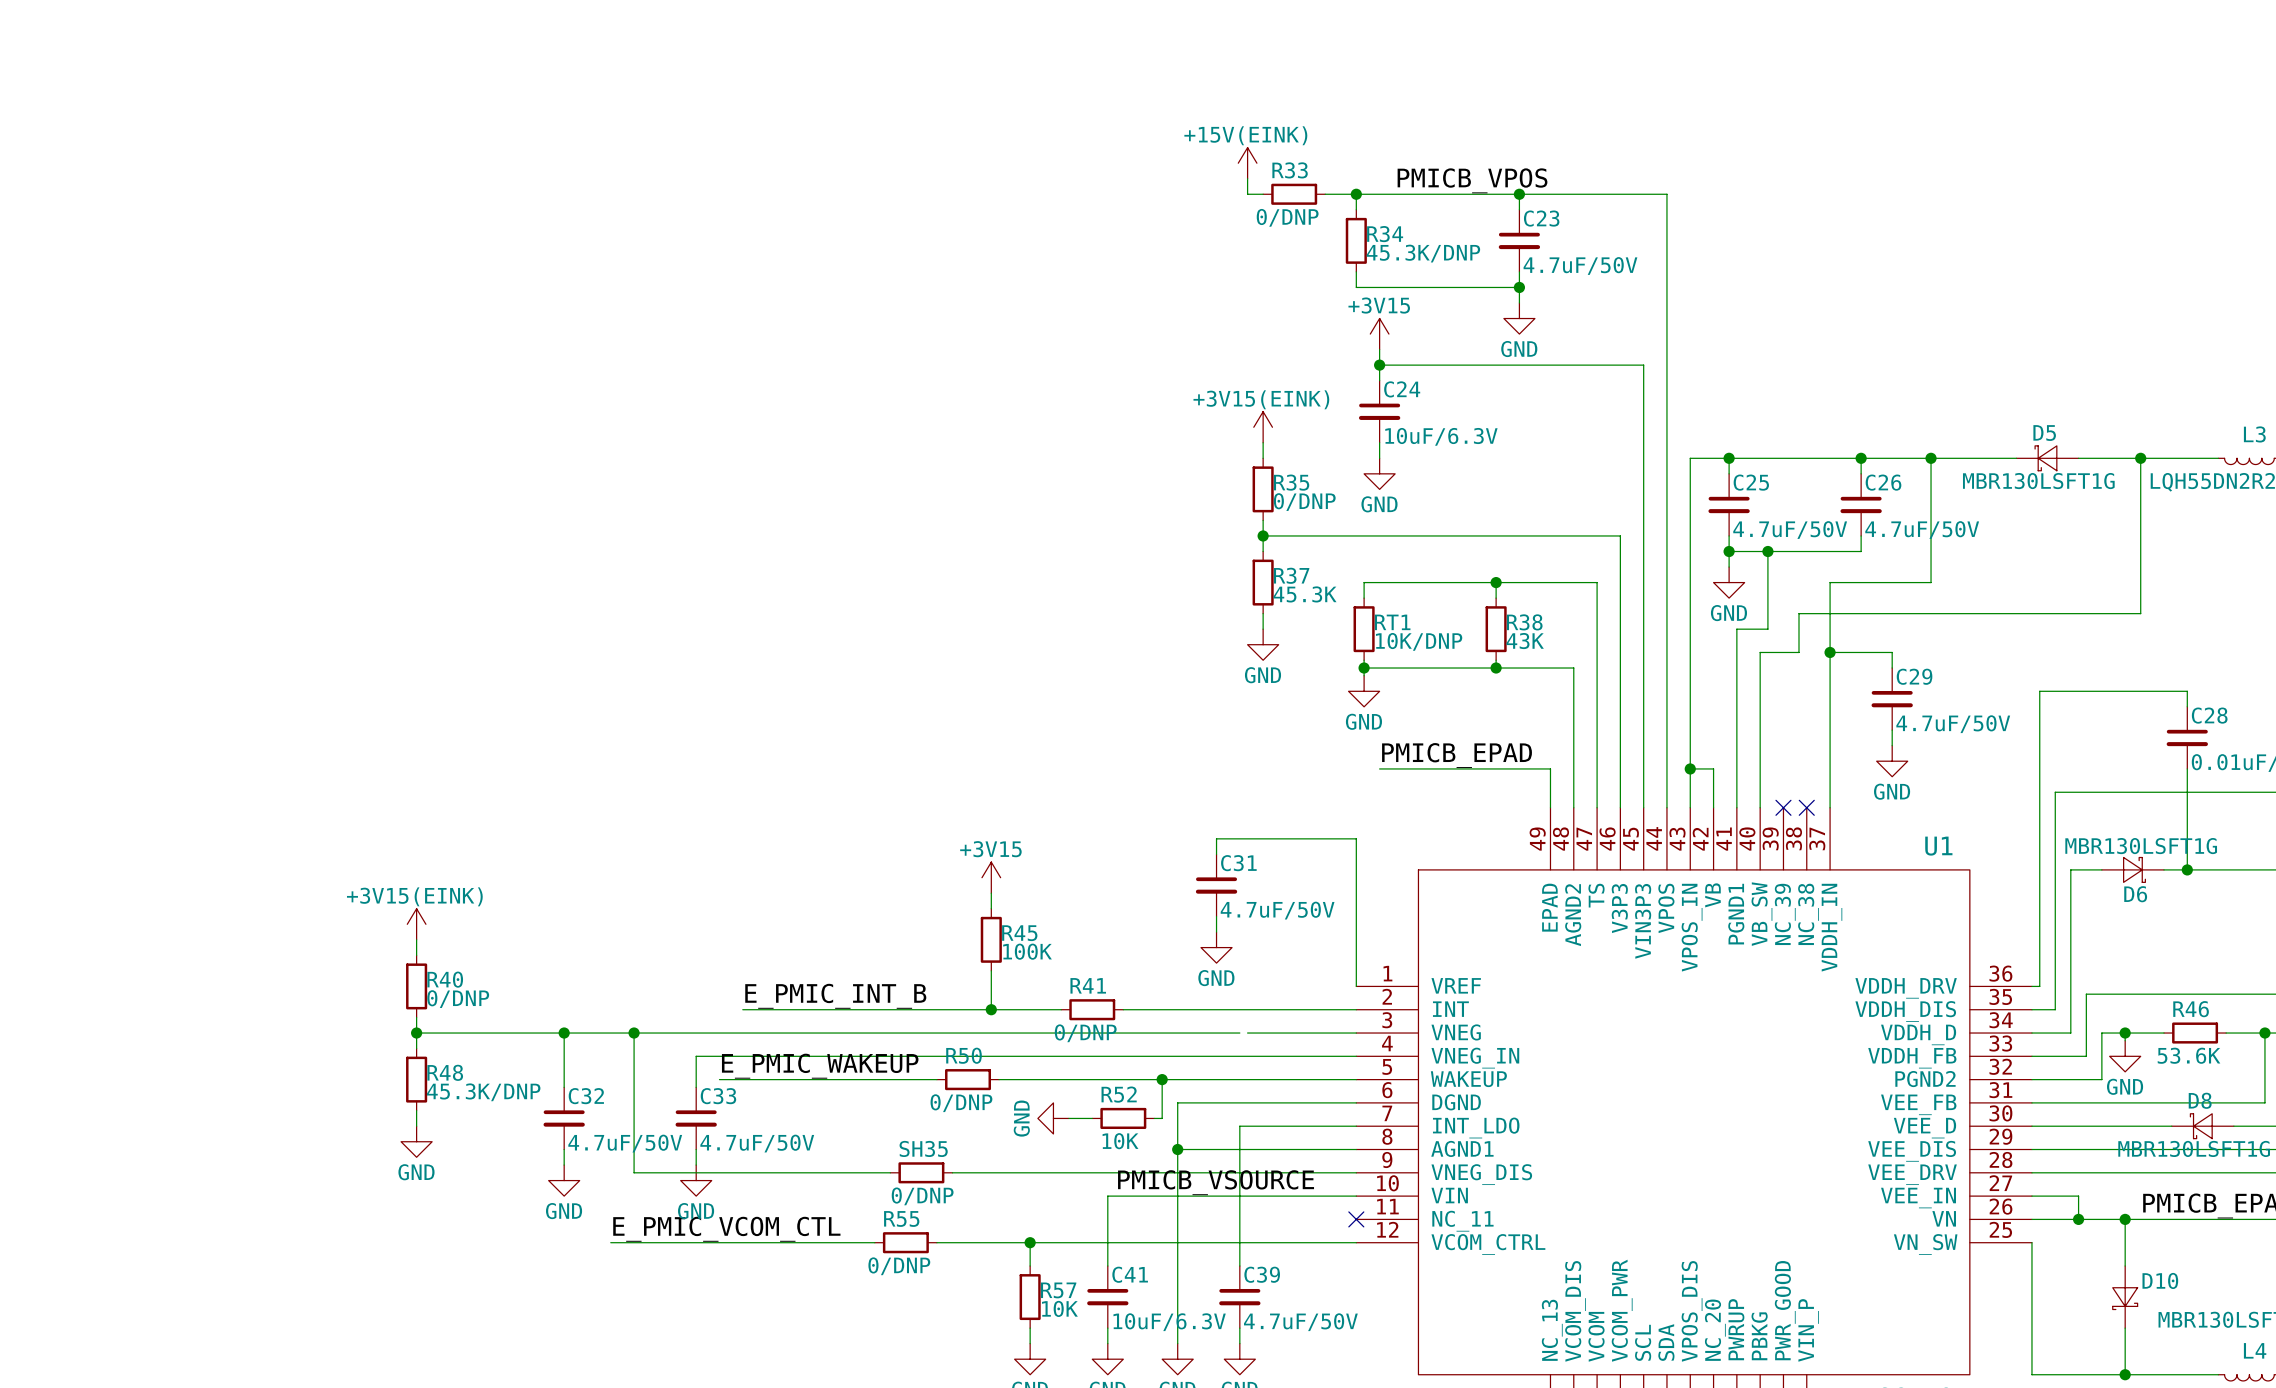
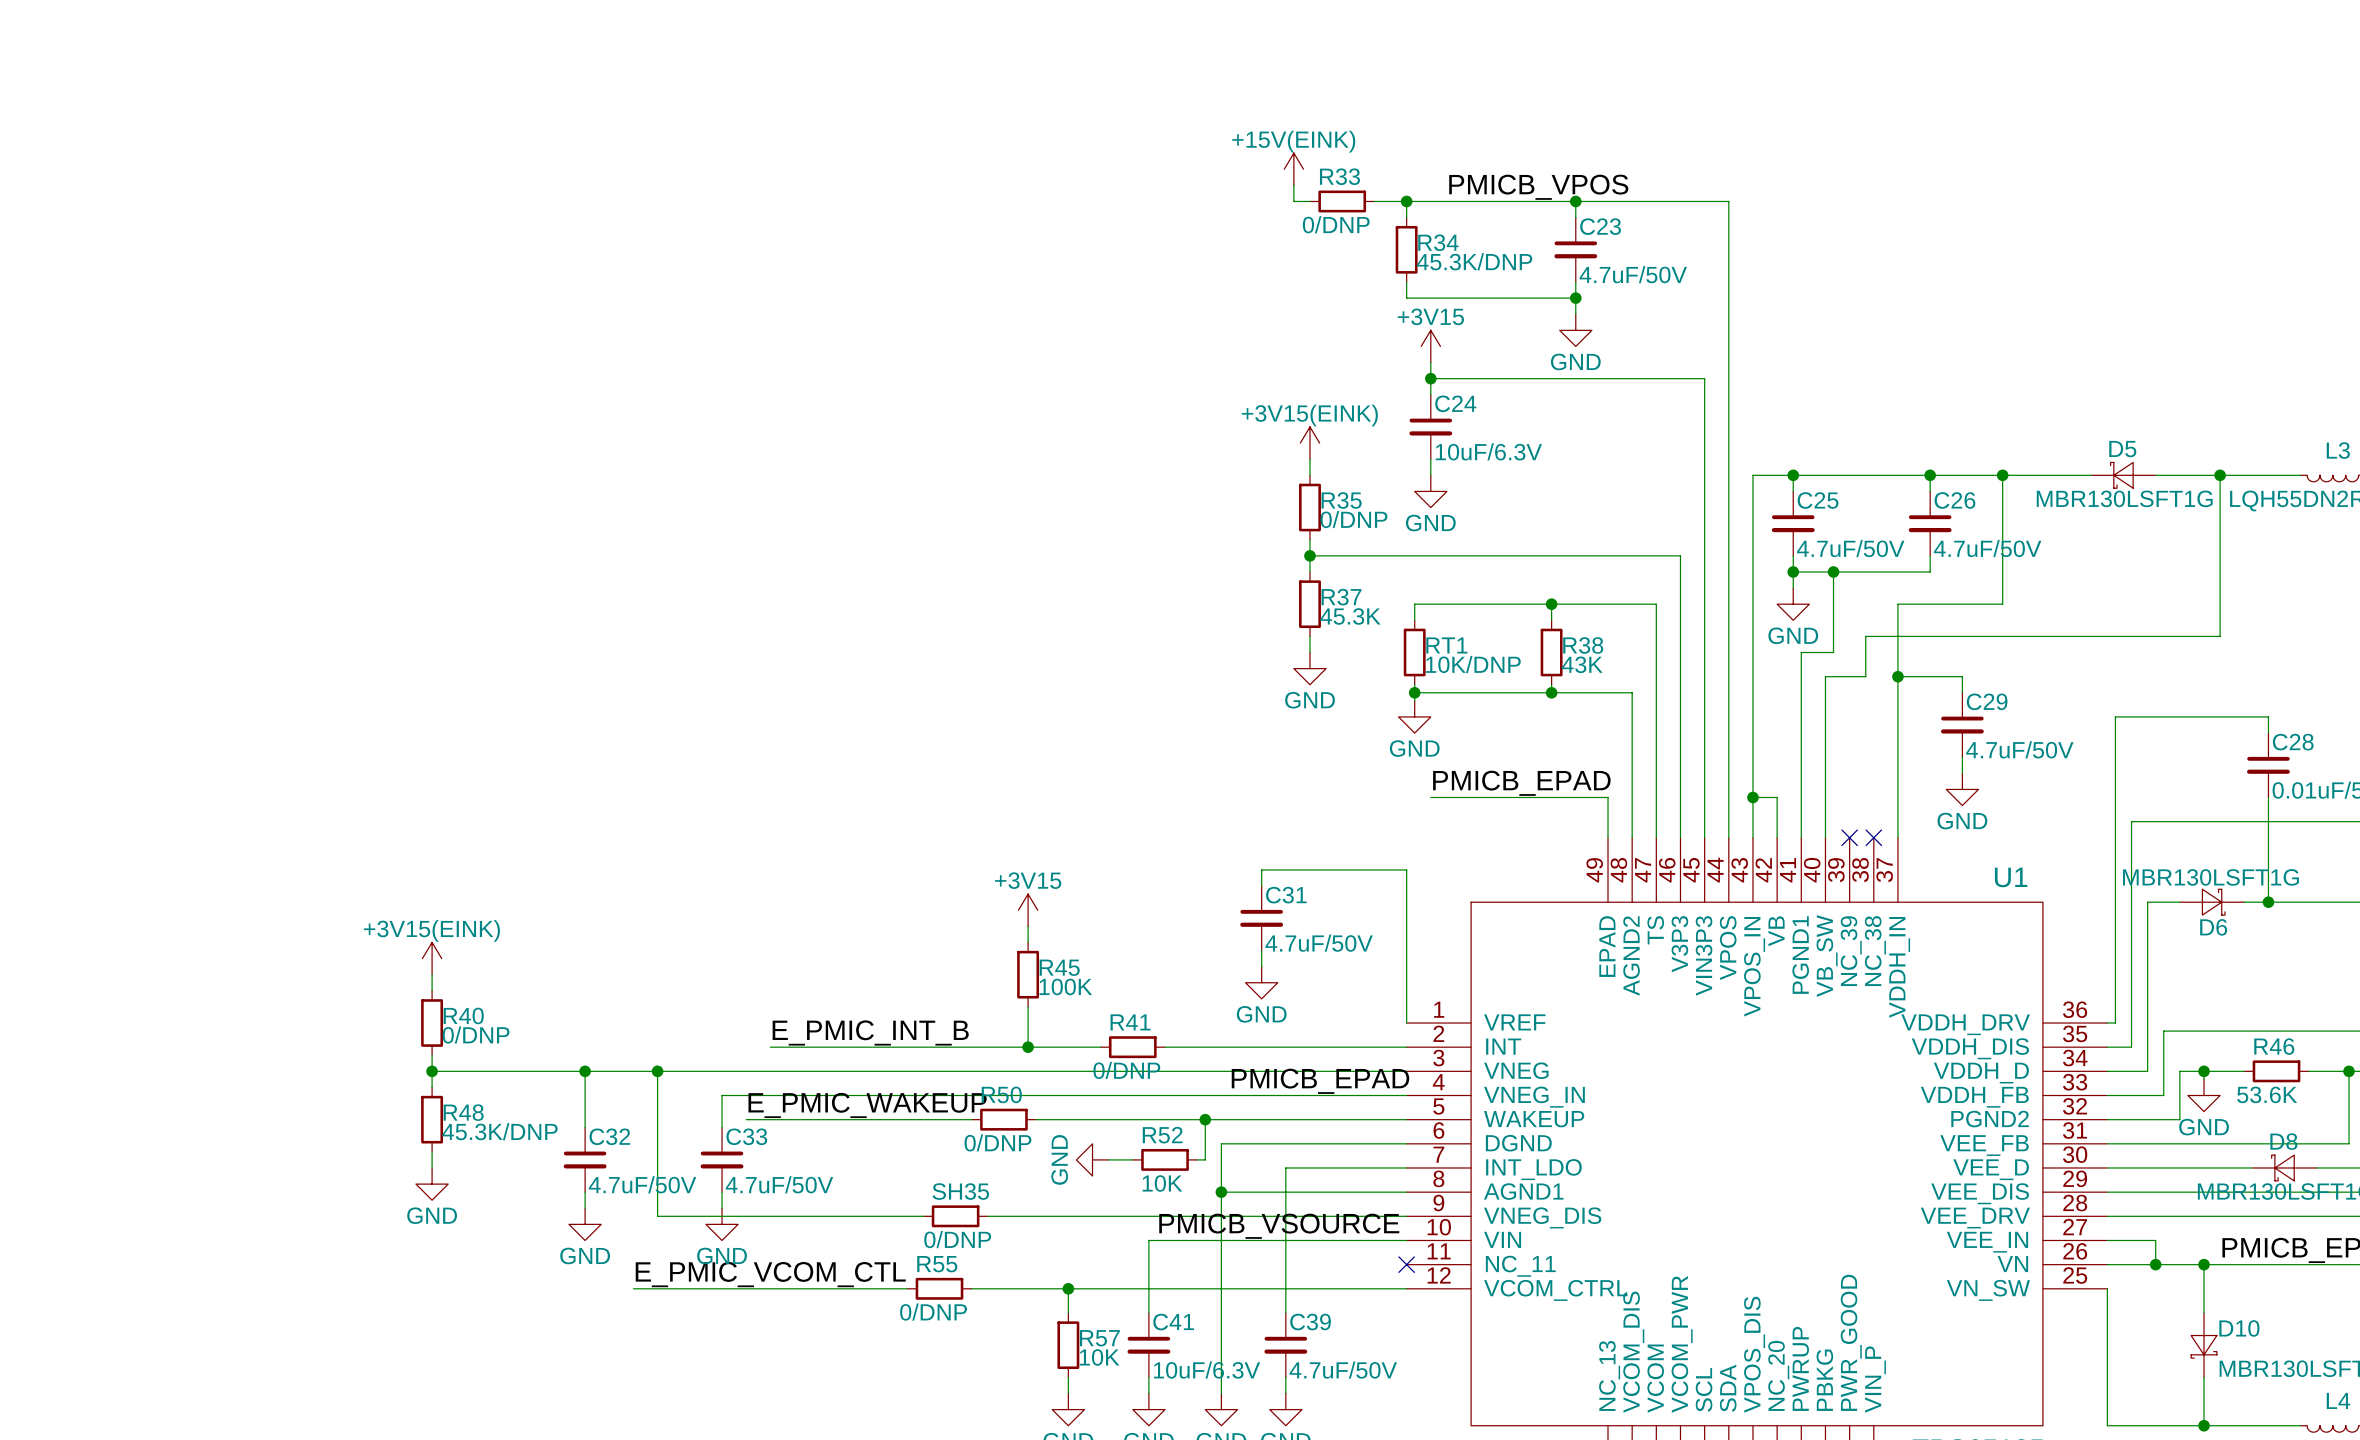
label: none -> PMICB_EPAD (1320, 1081)

